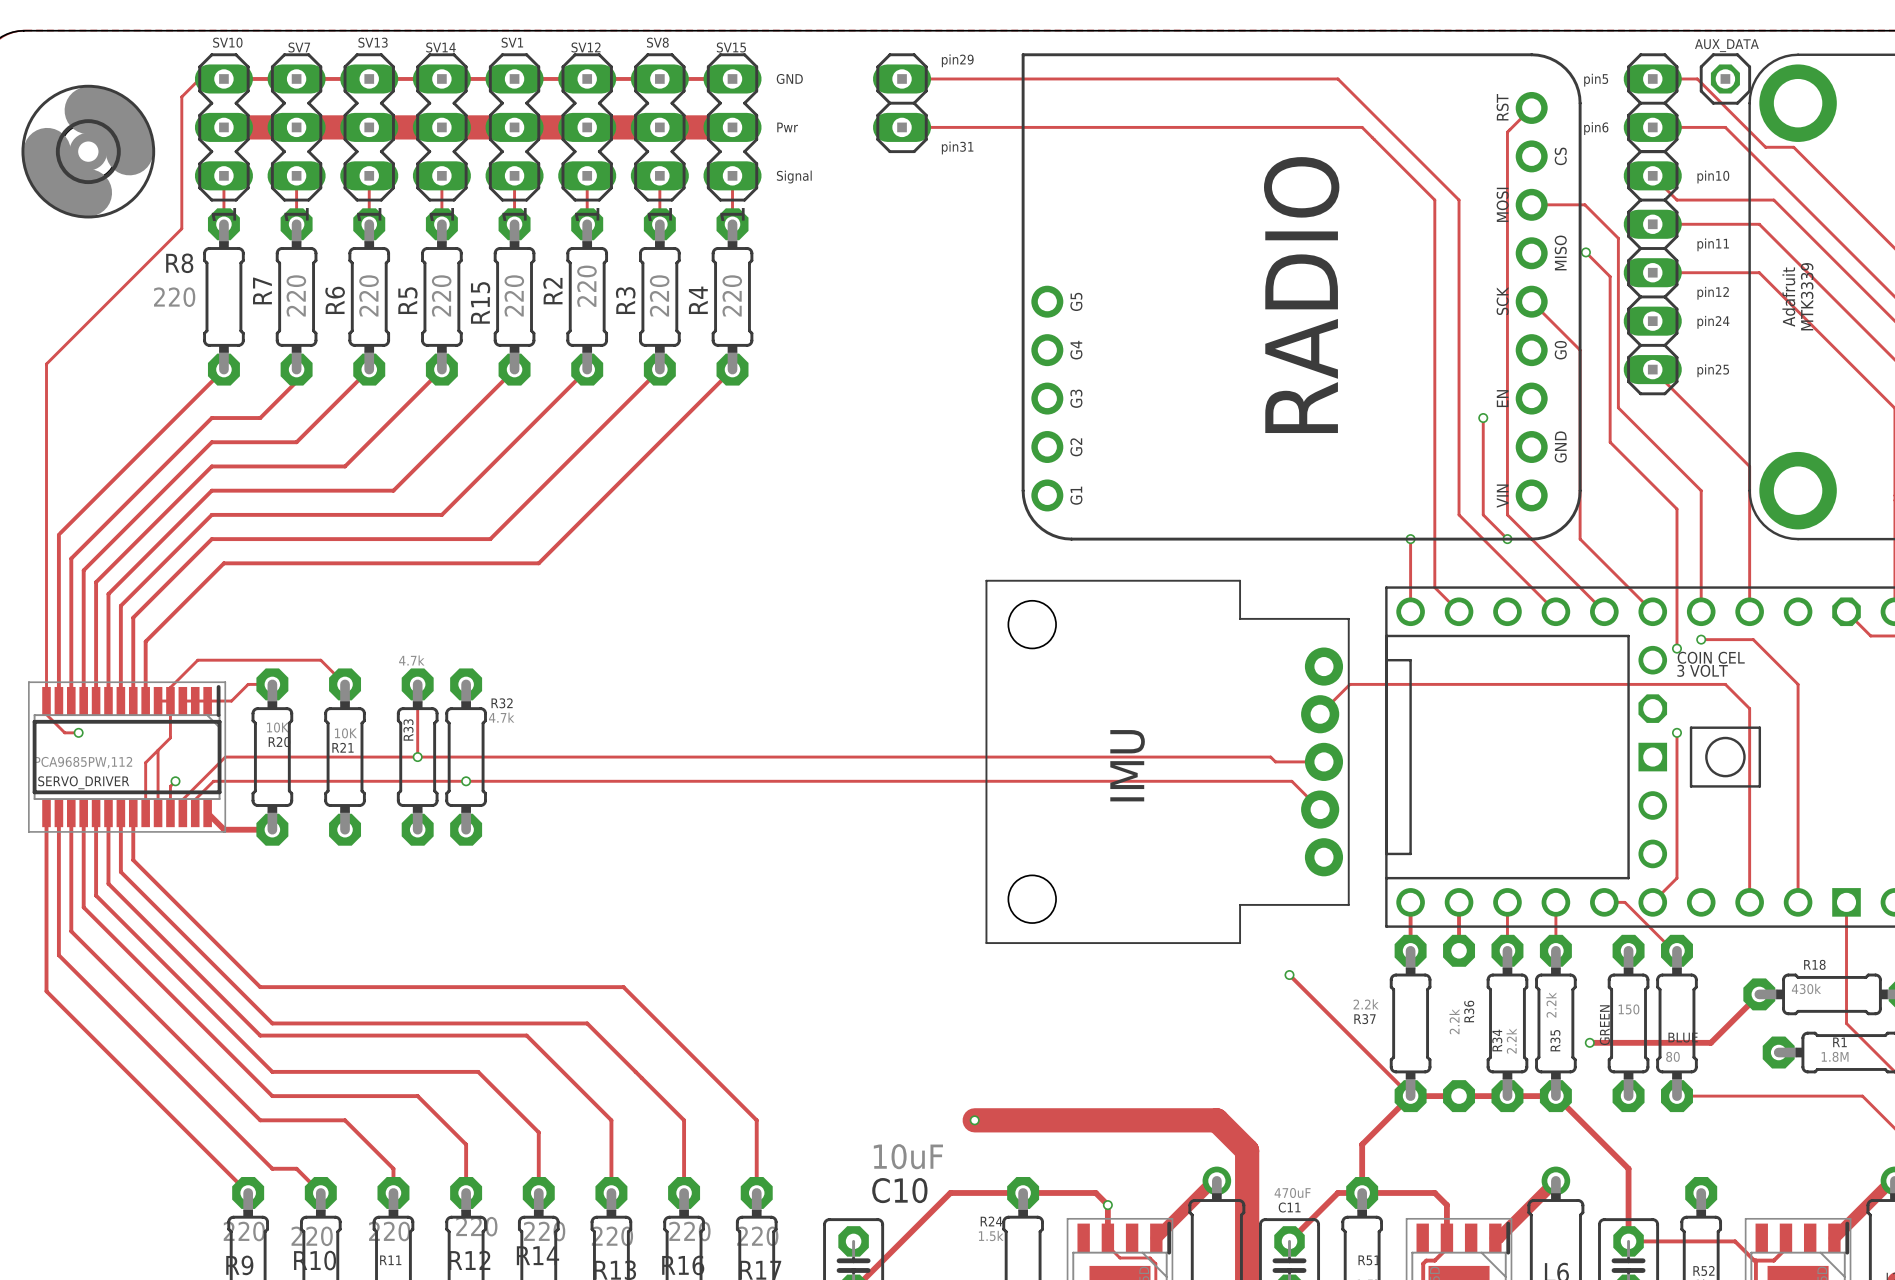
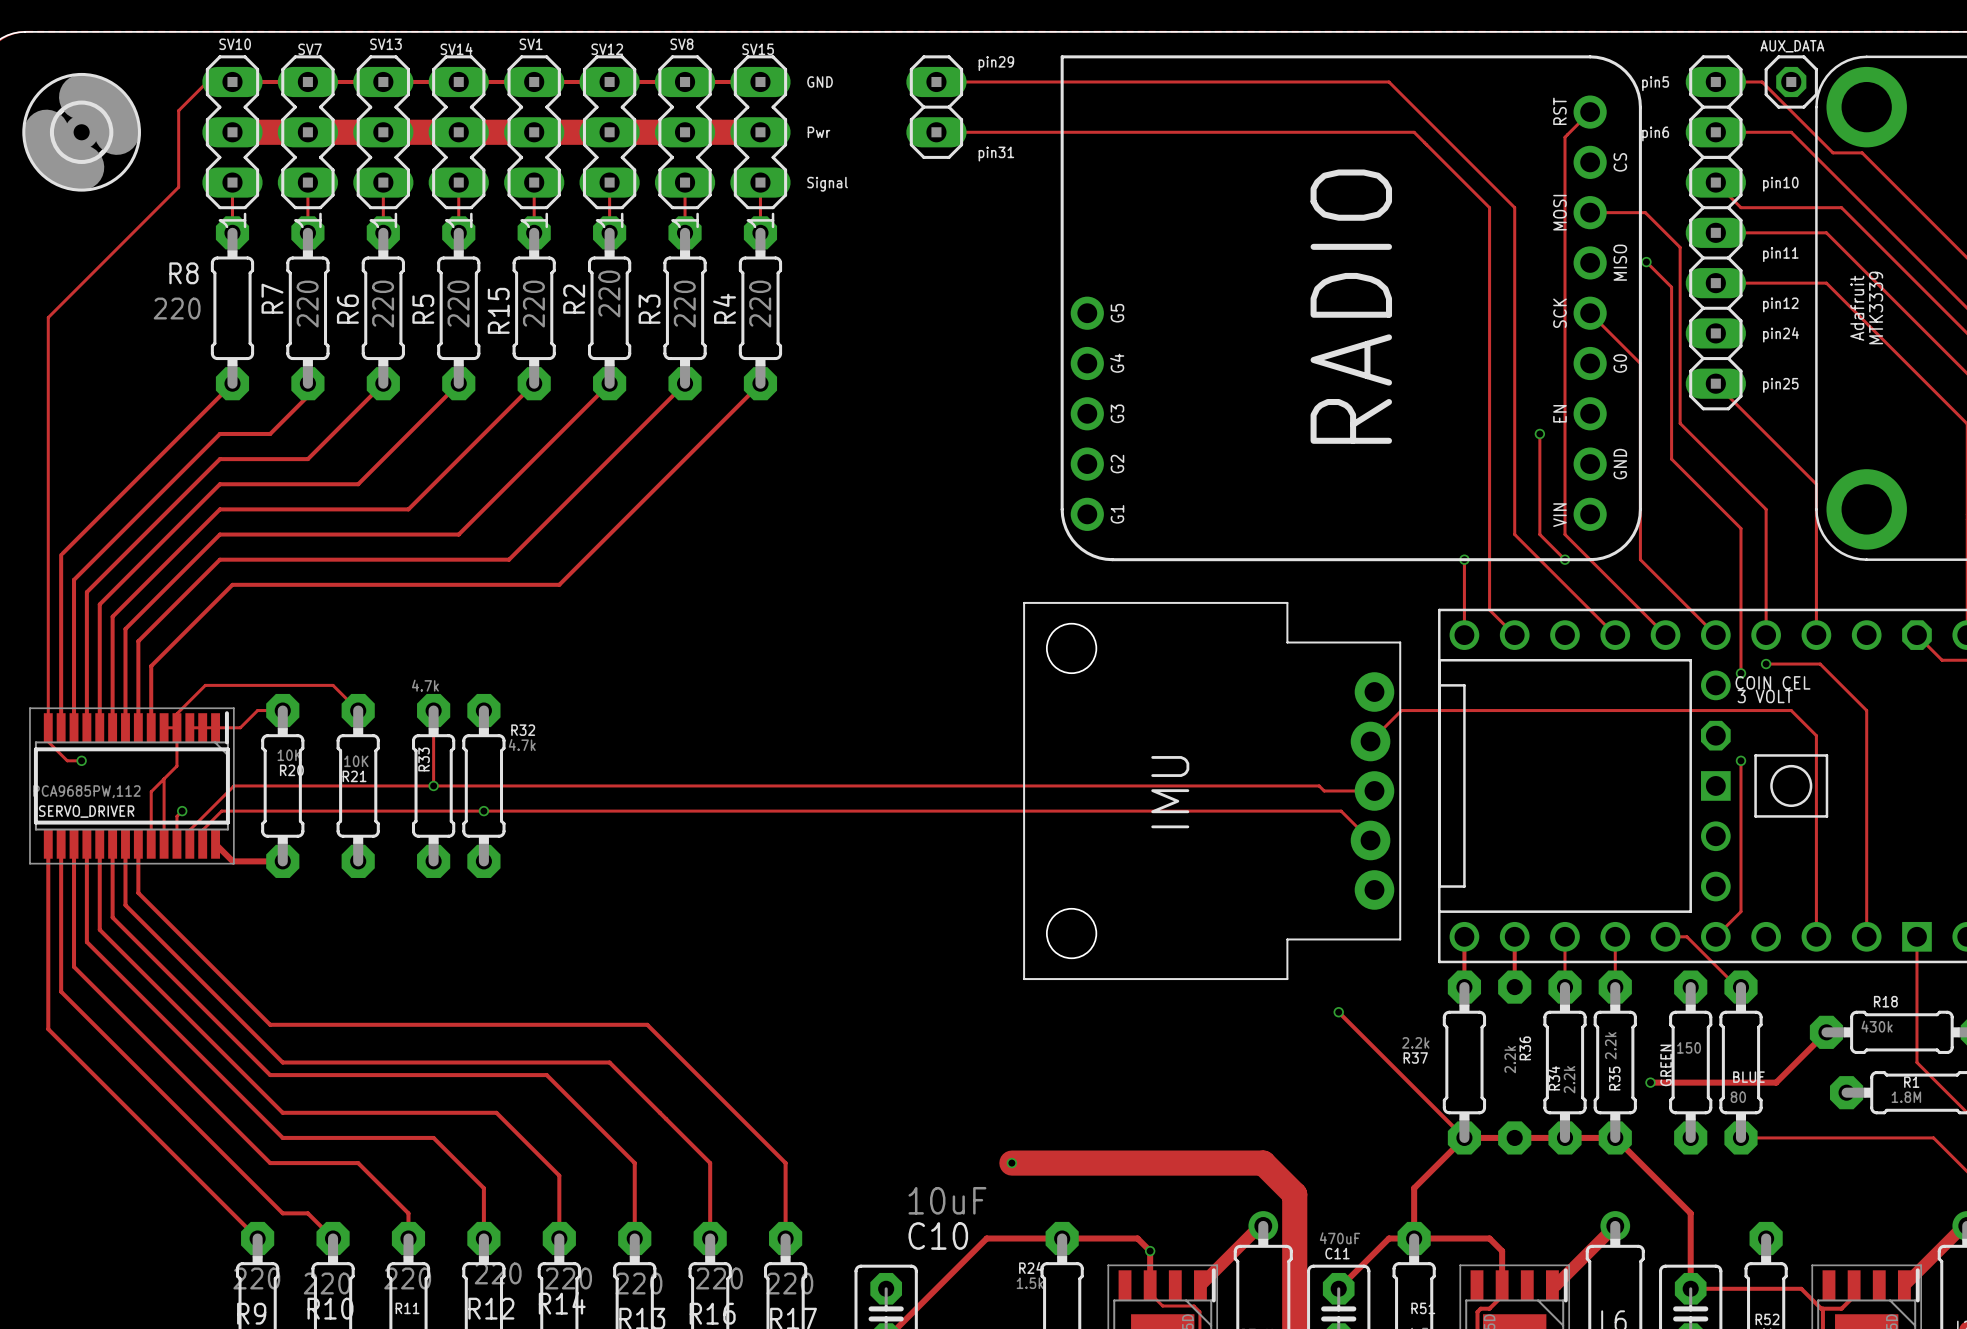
track: (181, 96) (181, 228) (46, 364) -> (188, 100) (178, 110) (178, 187) (48, 317) (48, 377)
part: none -> (81, 132)
part: (88, 151) -> none

